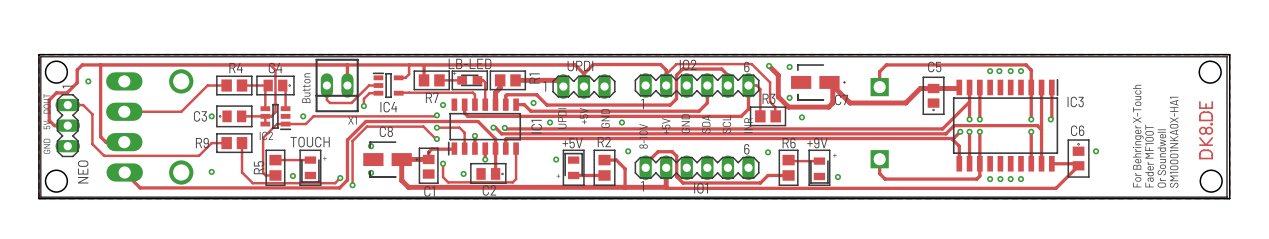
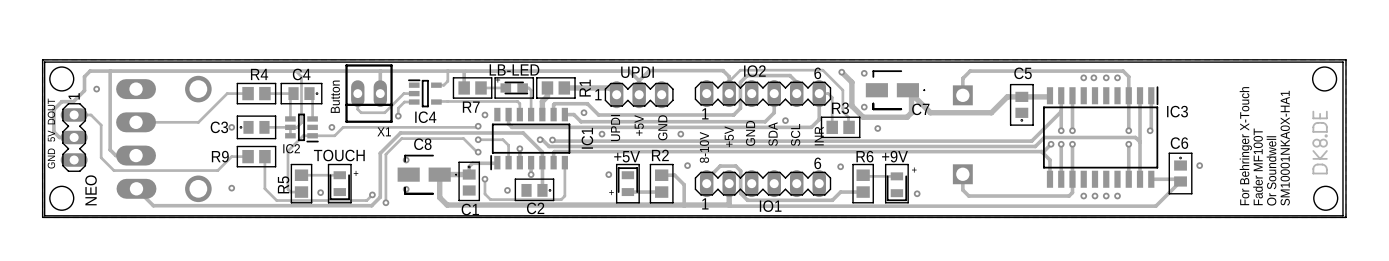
via: none -> (785, 120)

